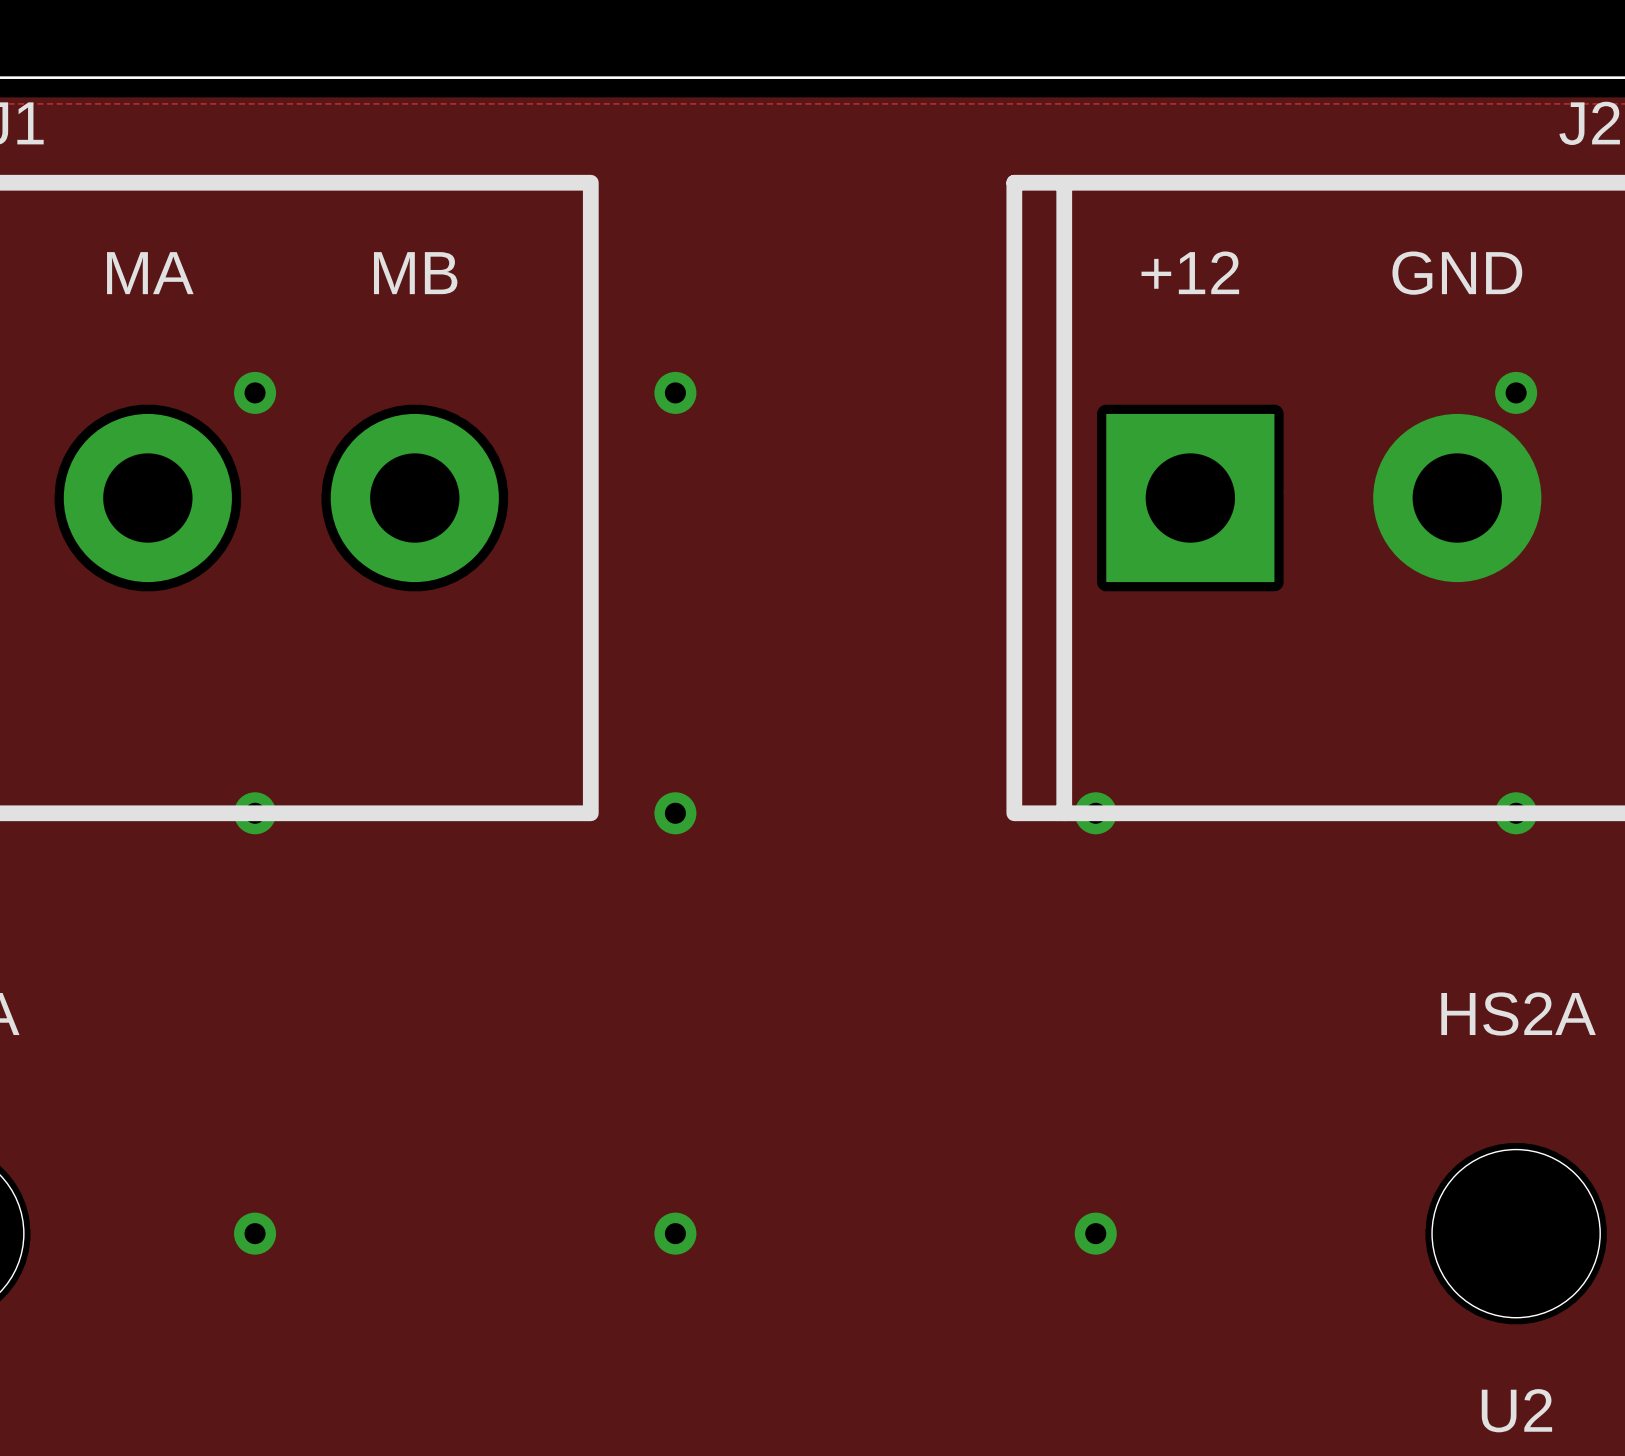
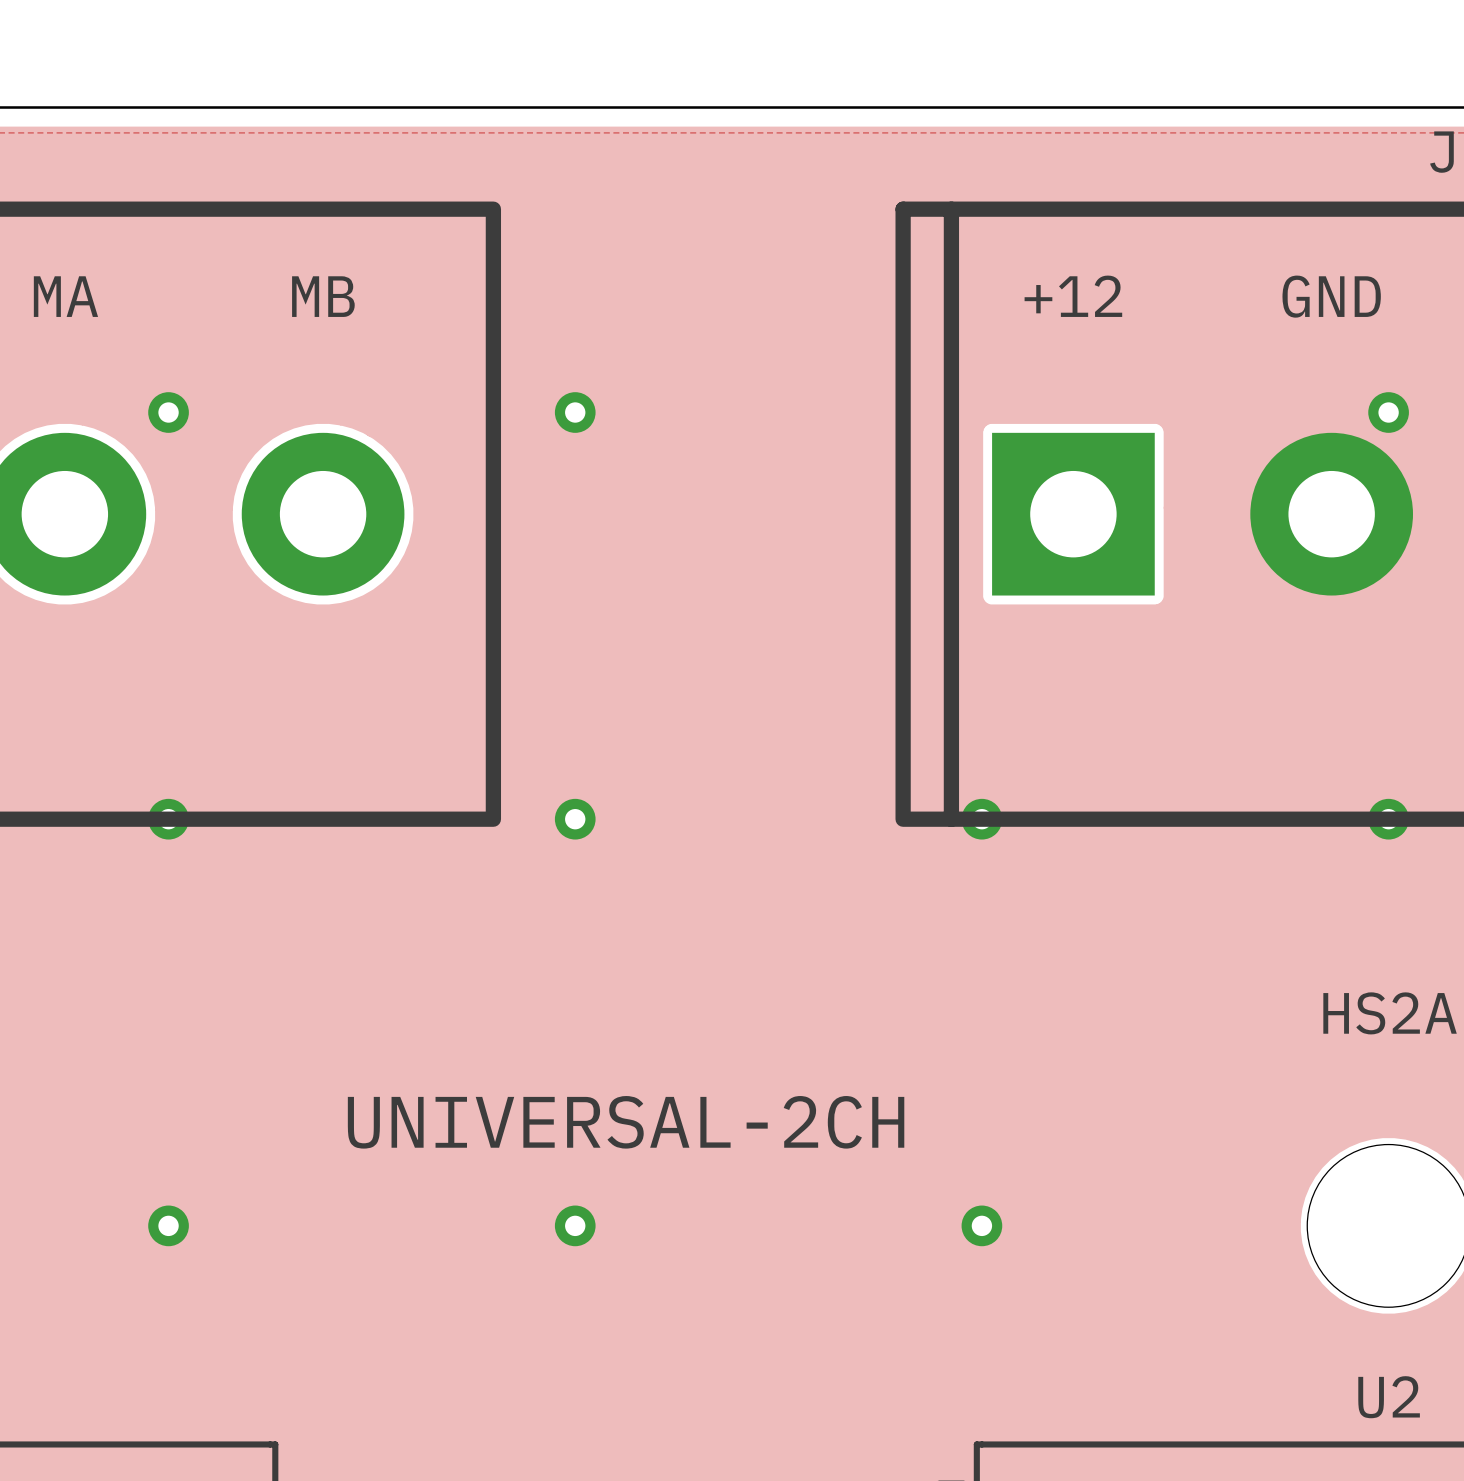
text: none -> UNIVERSAL-2CH (626, 1122)

